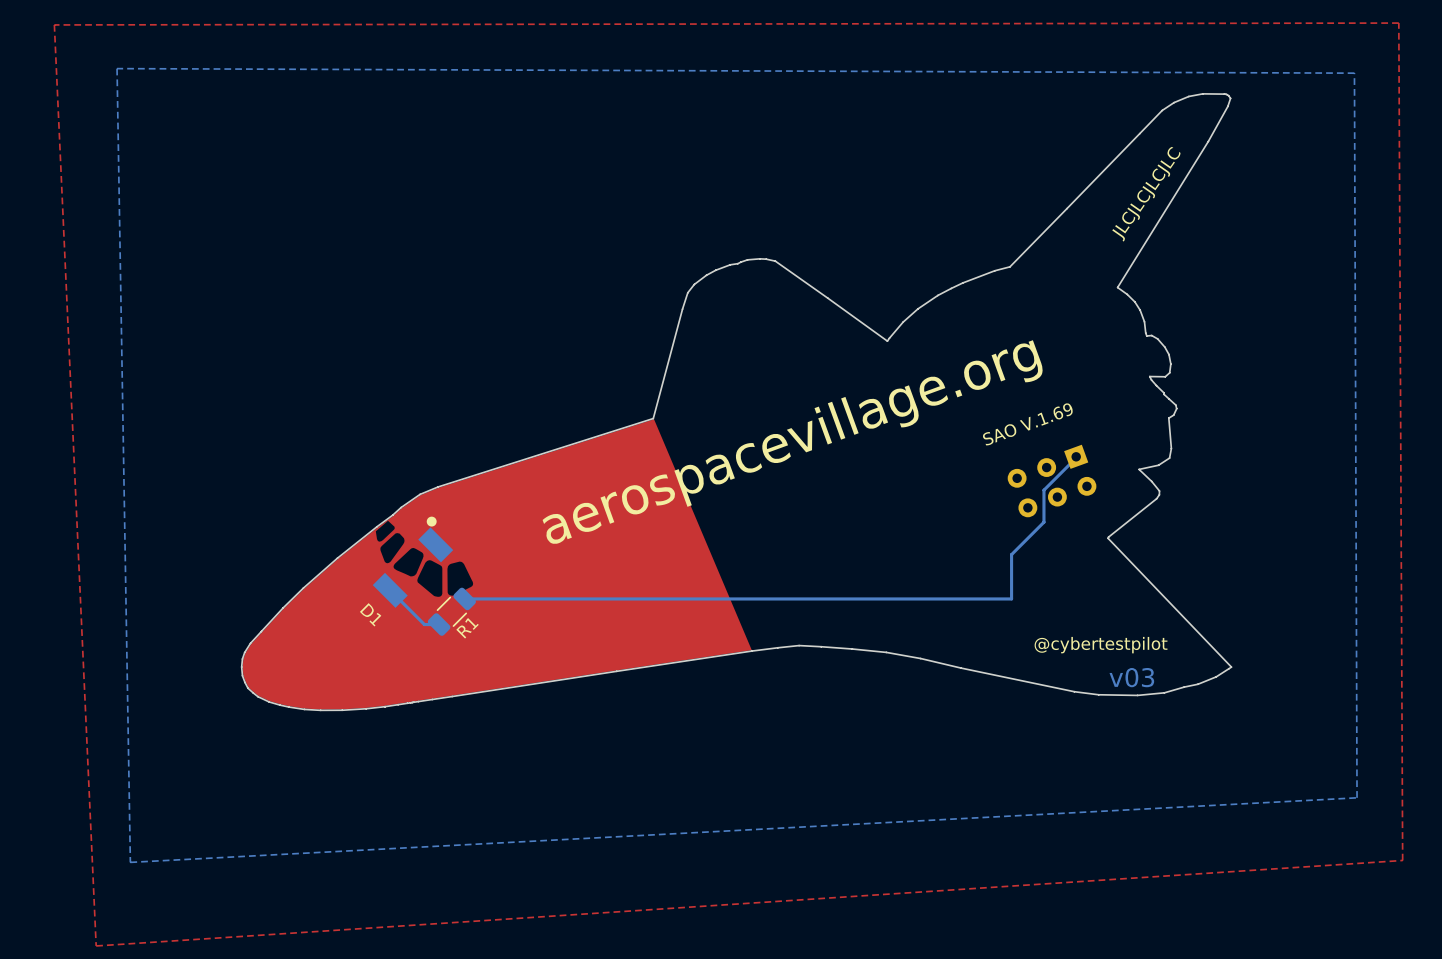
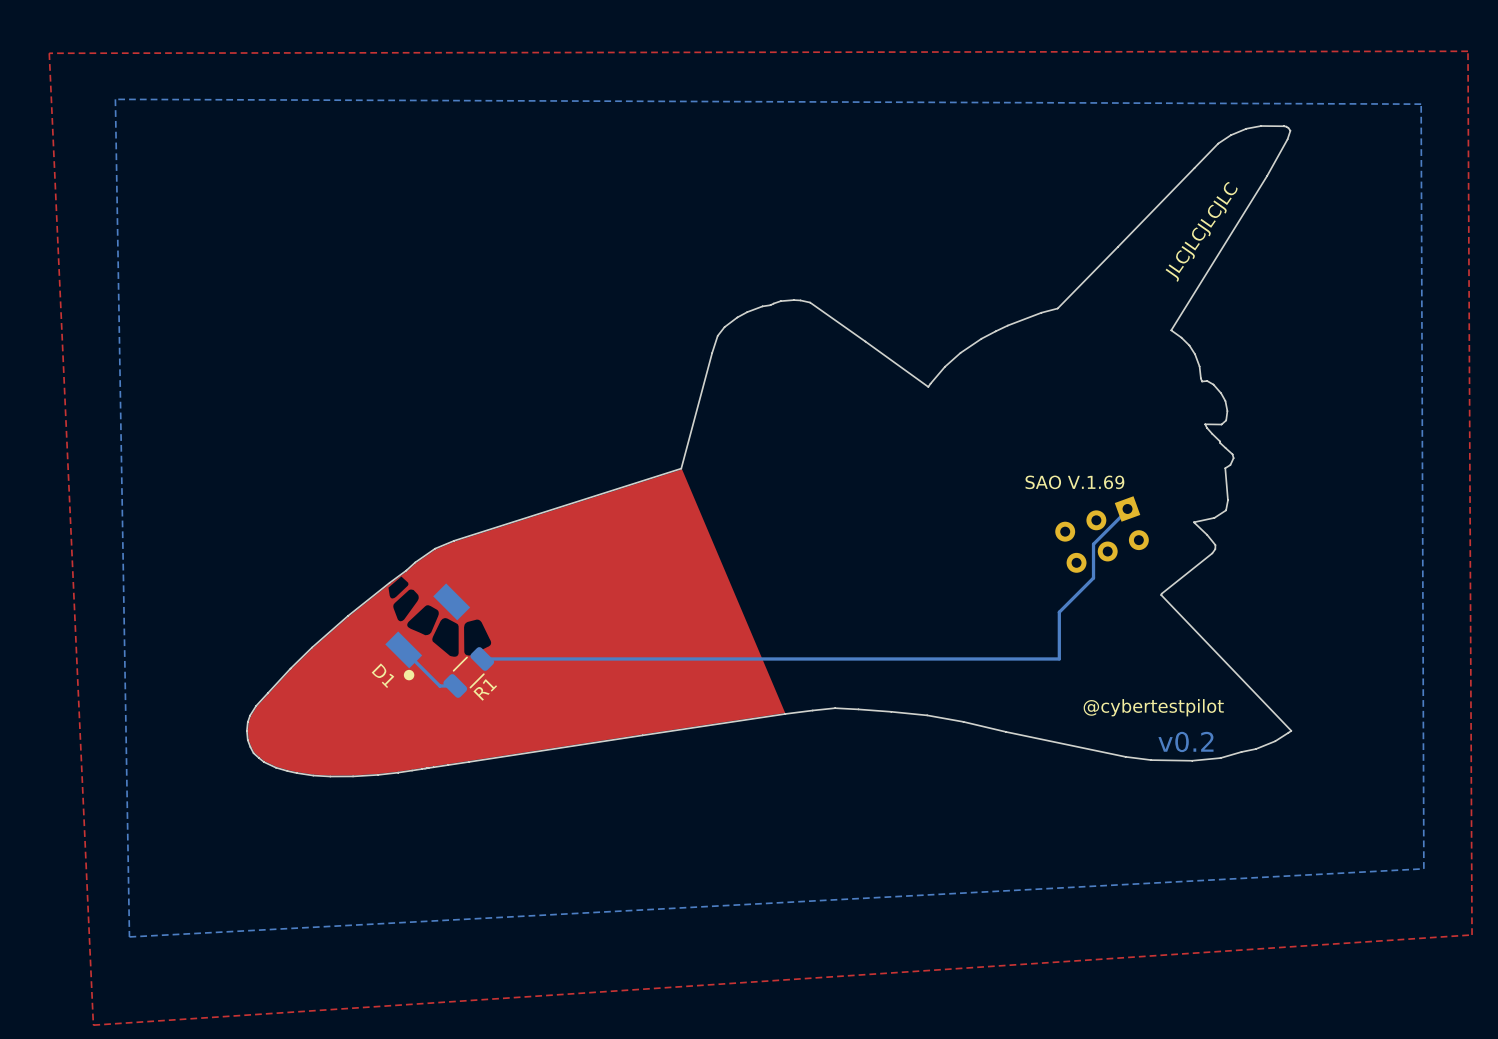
text rotation: 0° (1027, 424) -> 20° clockwise (1074, 482)
text: aerospacevillage.org (793, 442) -> none
D1 footprint: [372, 516, 454, 608] -> [385, 583, 471, 681]
text: v03 (1131, 677) -> v0.2 (1185, 741)

